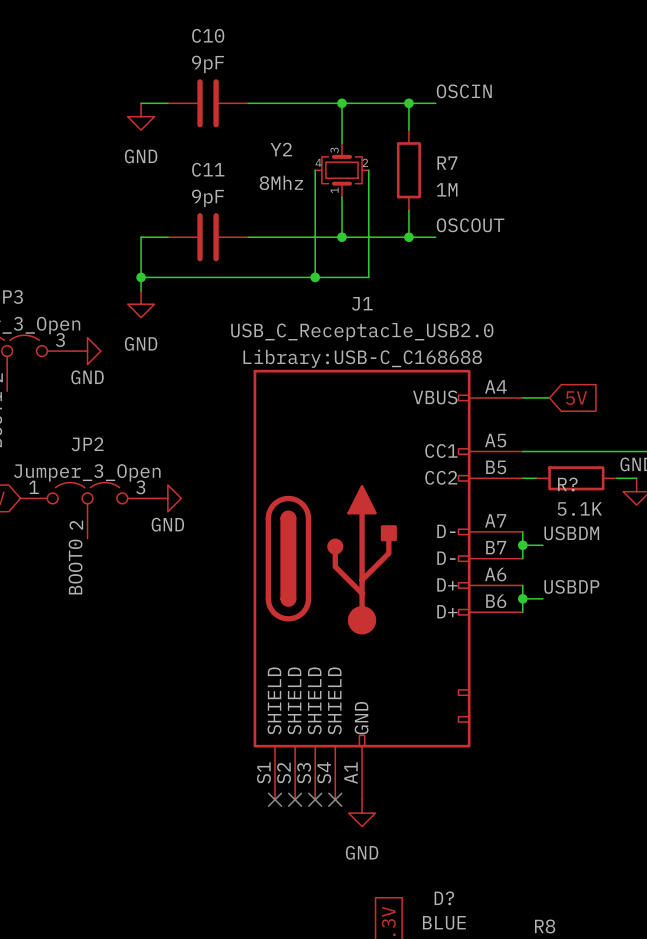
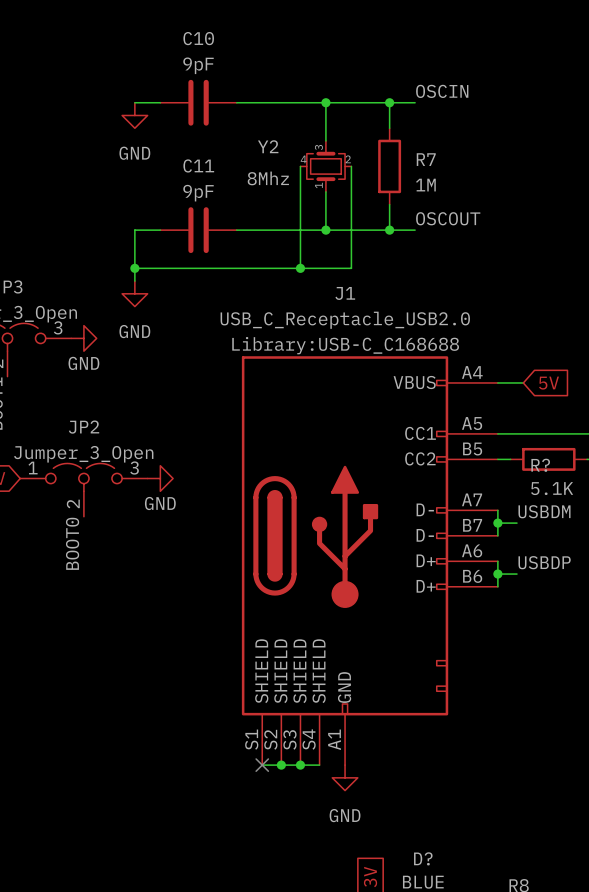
wire: none -> (262, 765) (319, 765)
no-connect mark: (295, 799) -> none
junction: none -> (281, 765)
no-connect mark: (315, 799) -> none
junction: none -> (300, 765)
no-connect mark: (335, 799) -> none

